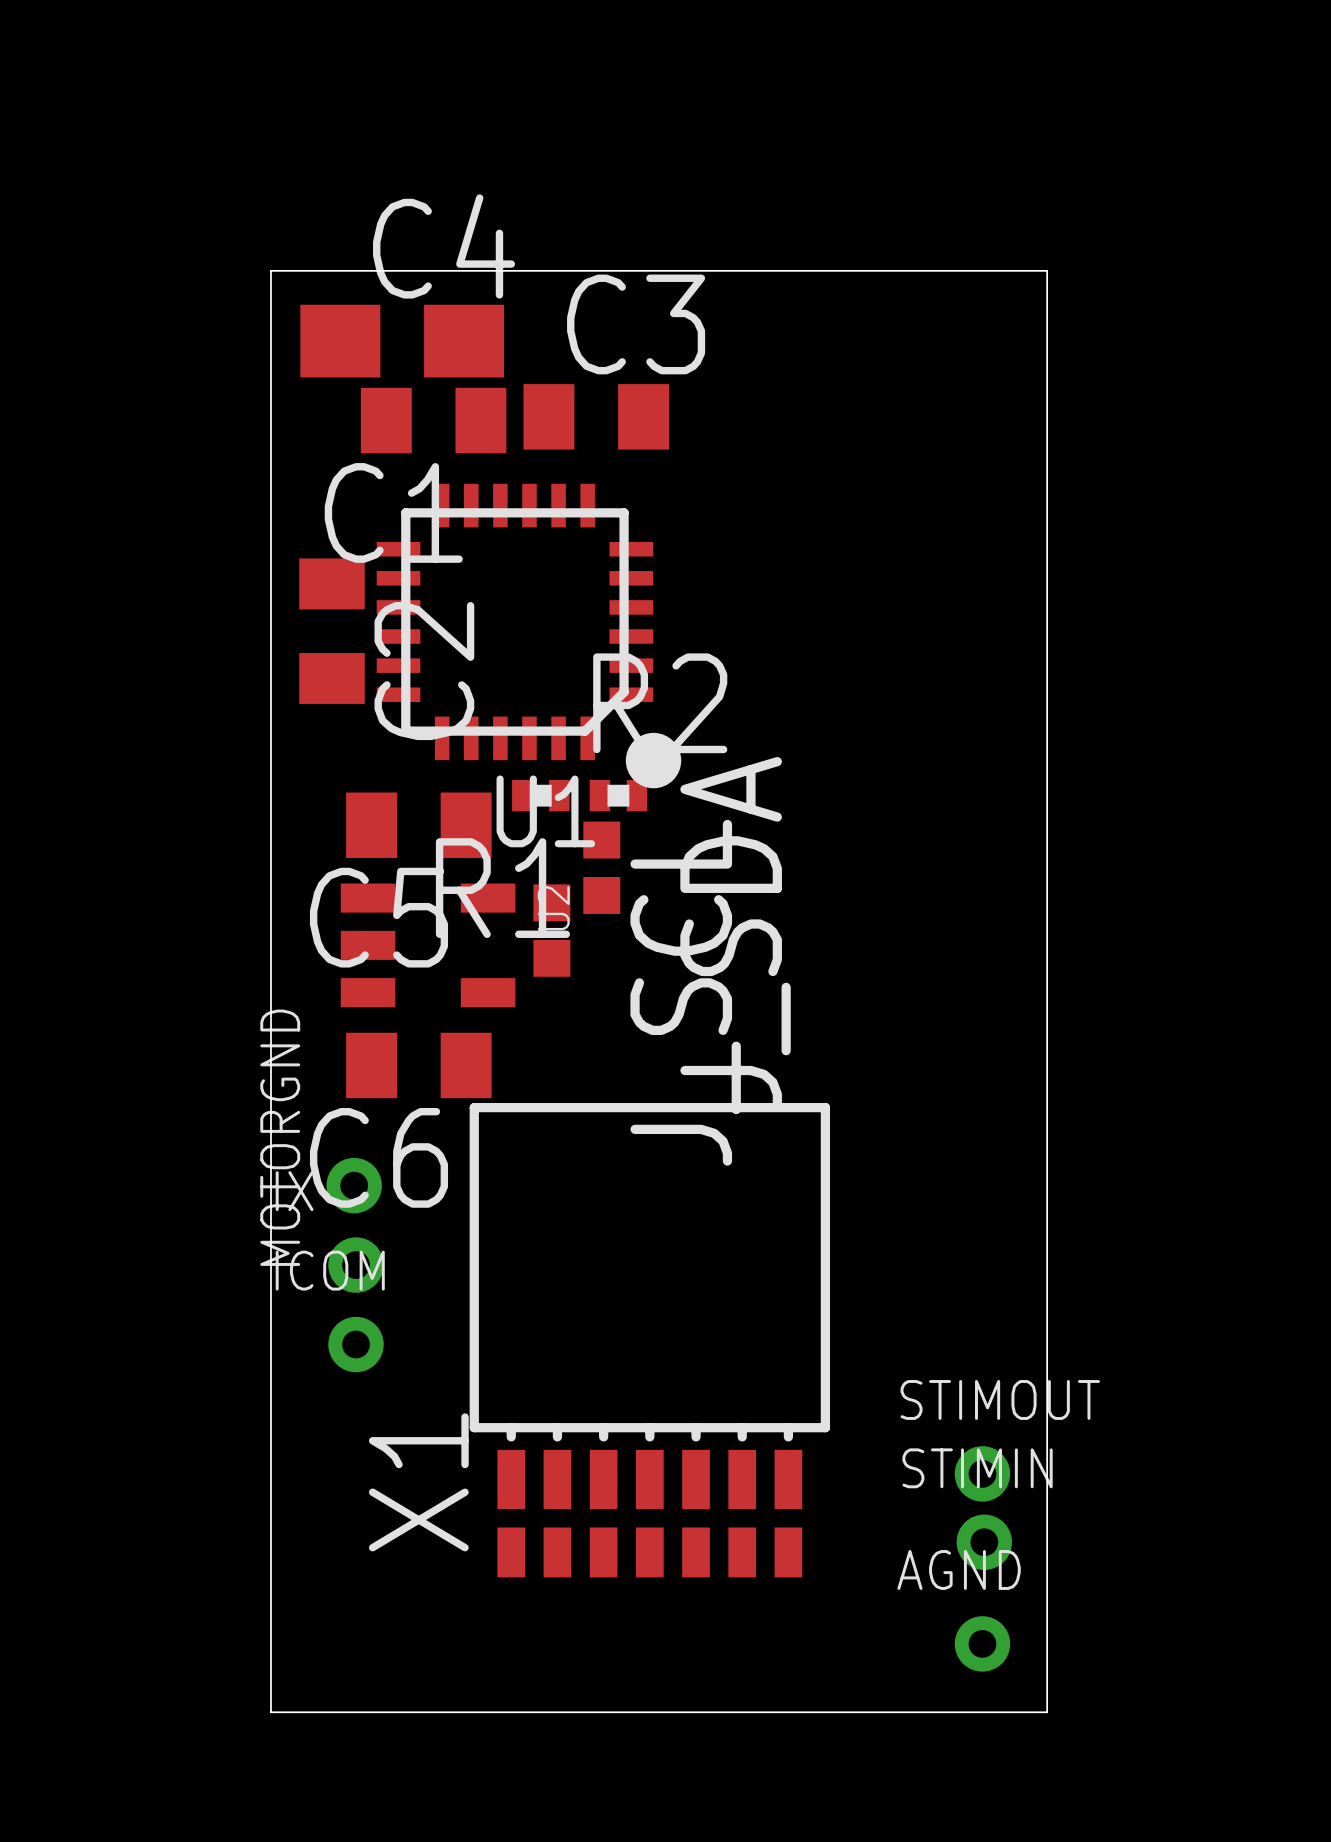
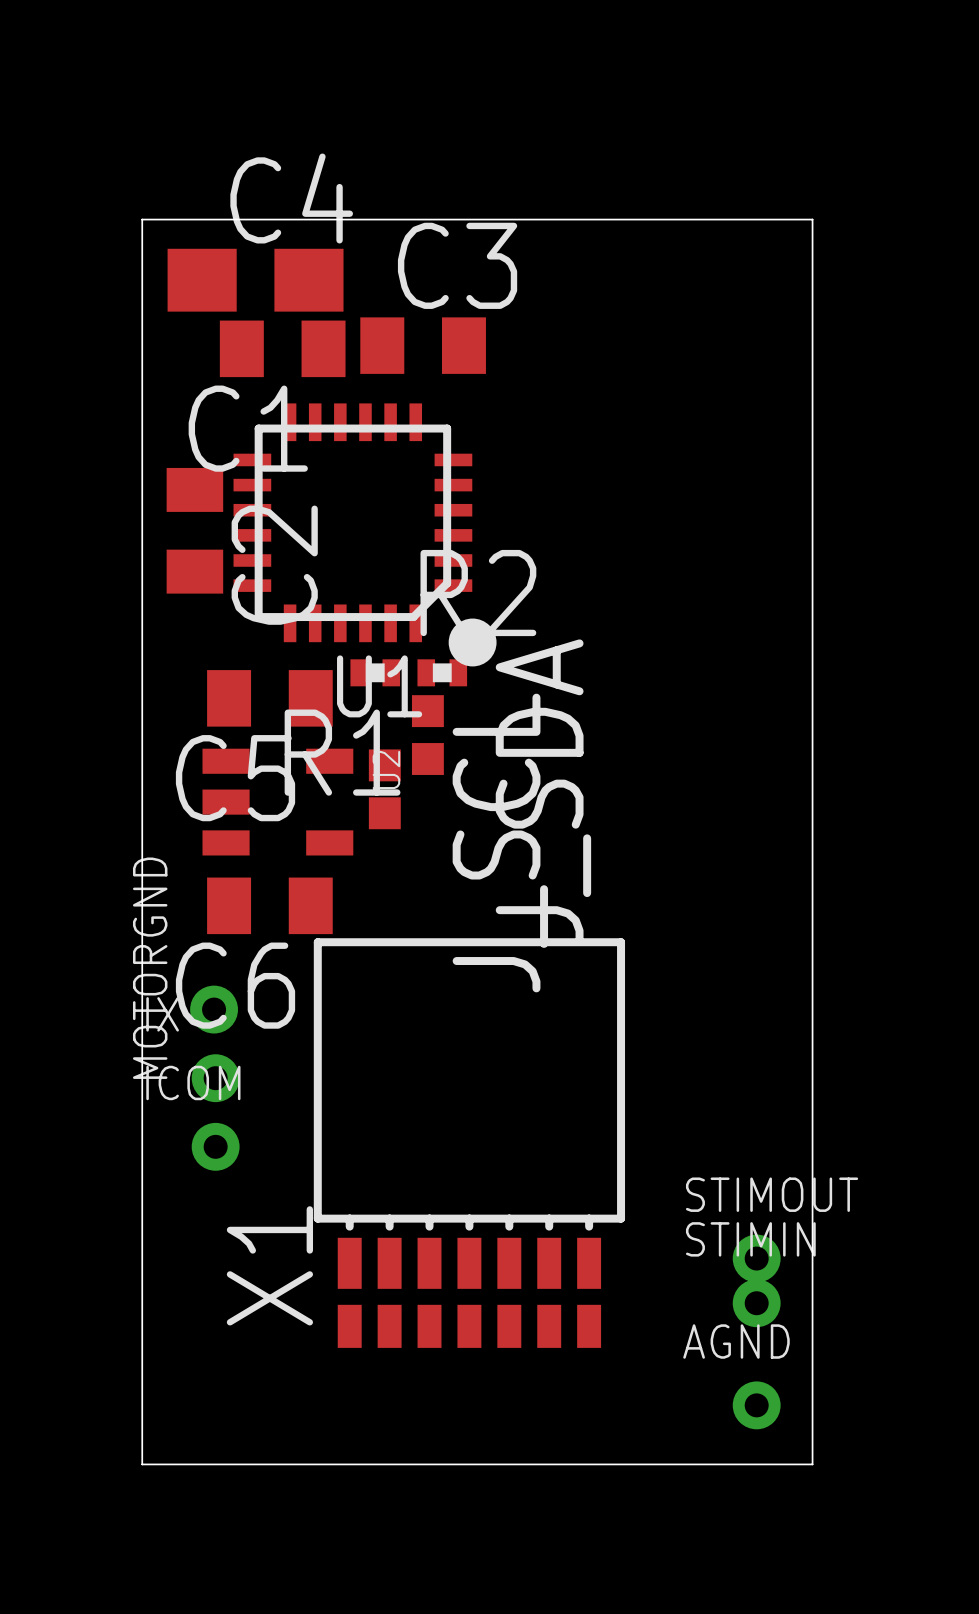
STIMIN position: (984, 1542) -> (756, 1303)

